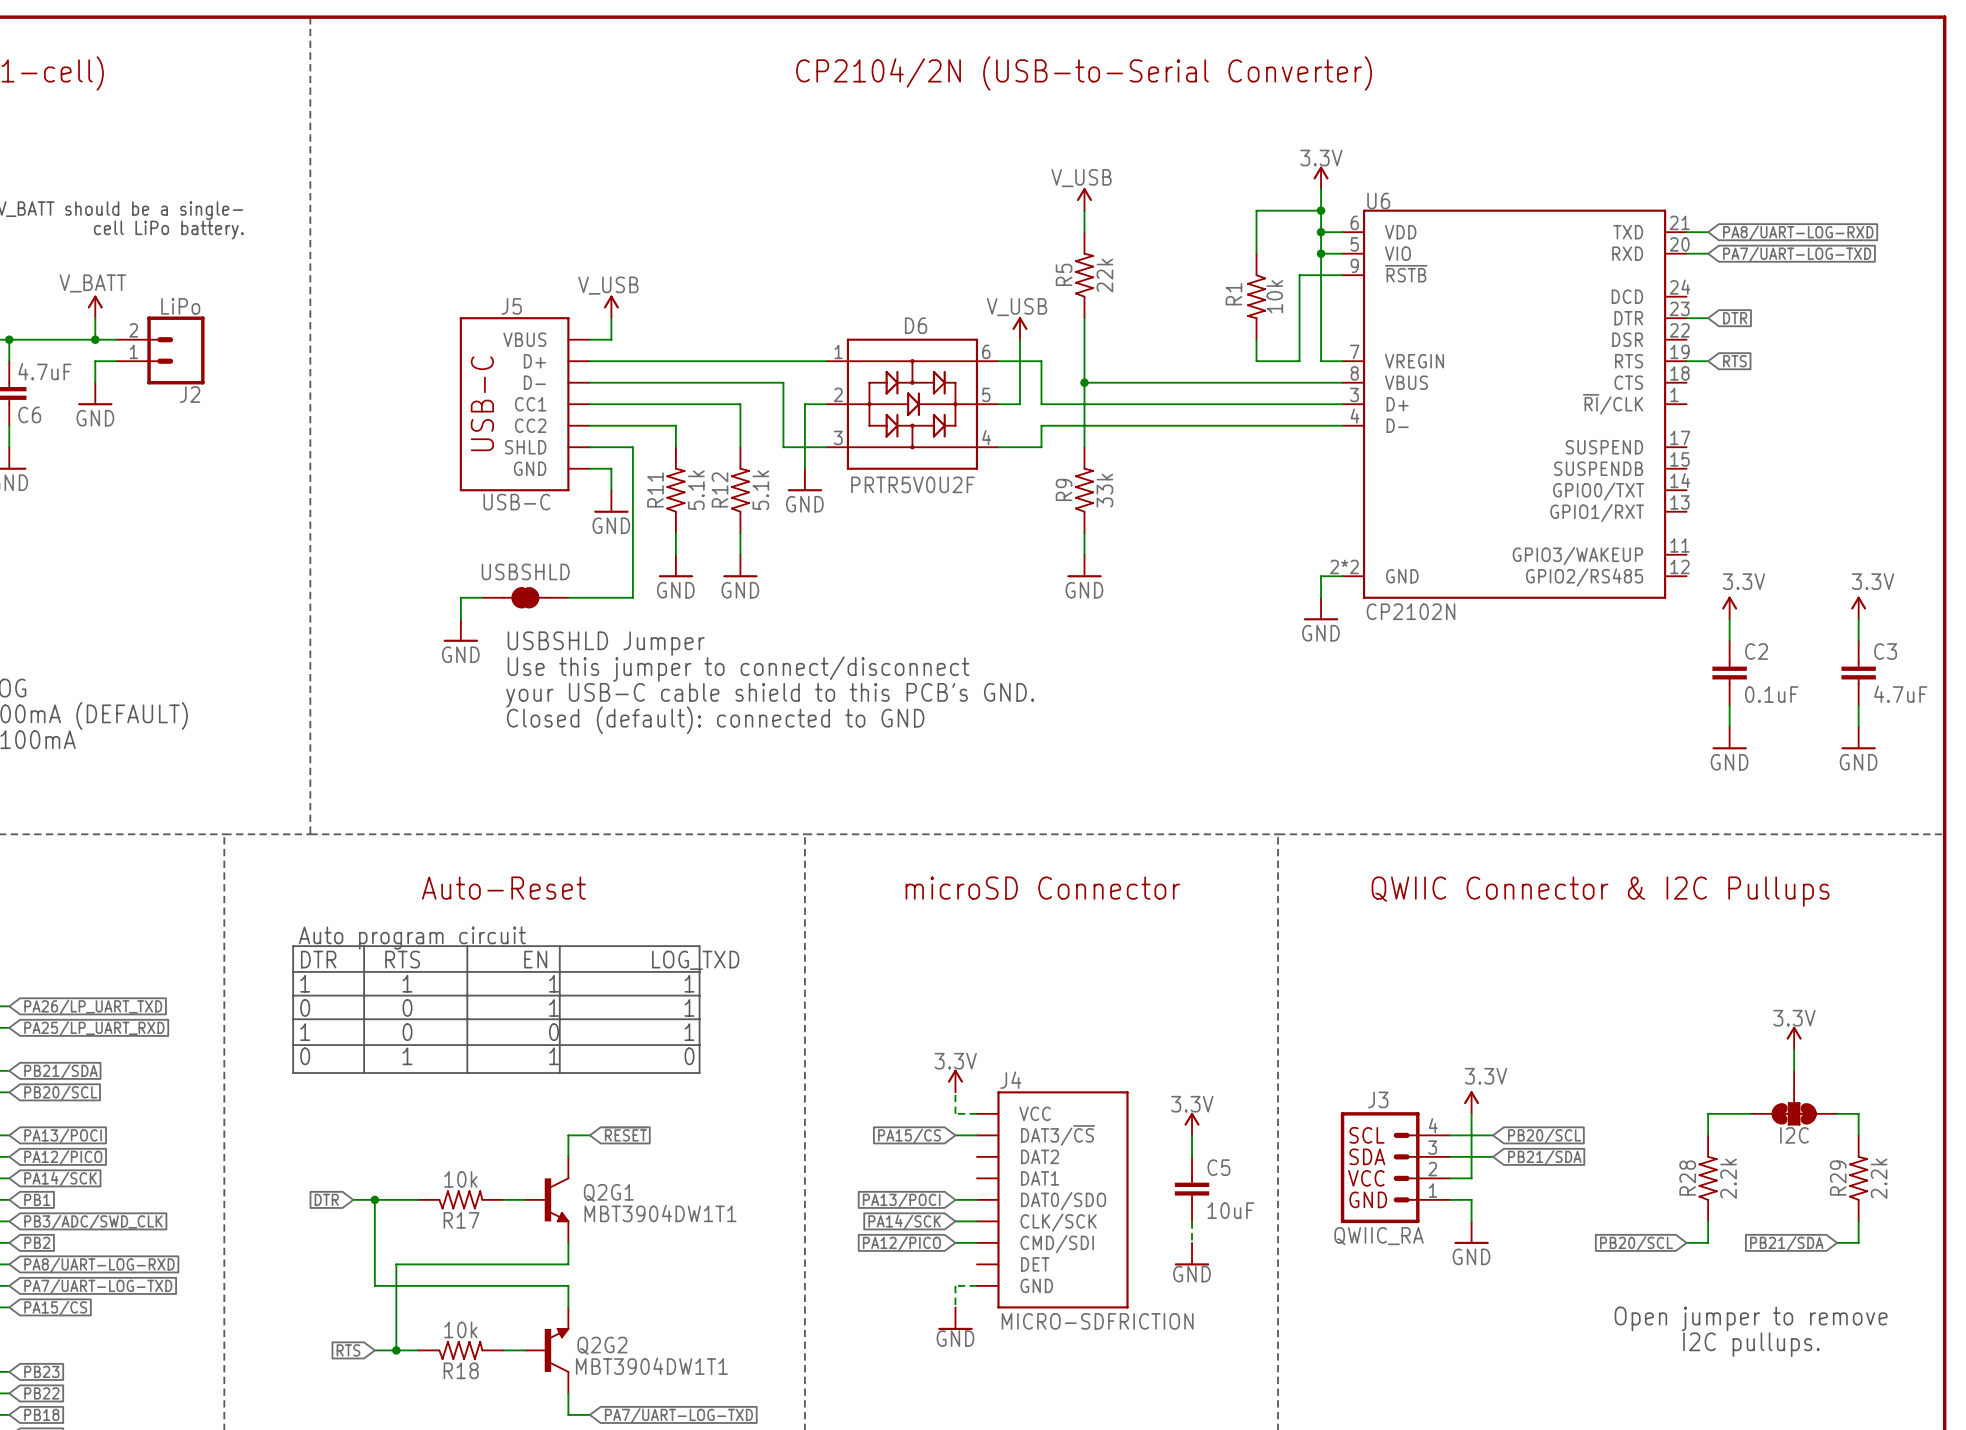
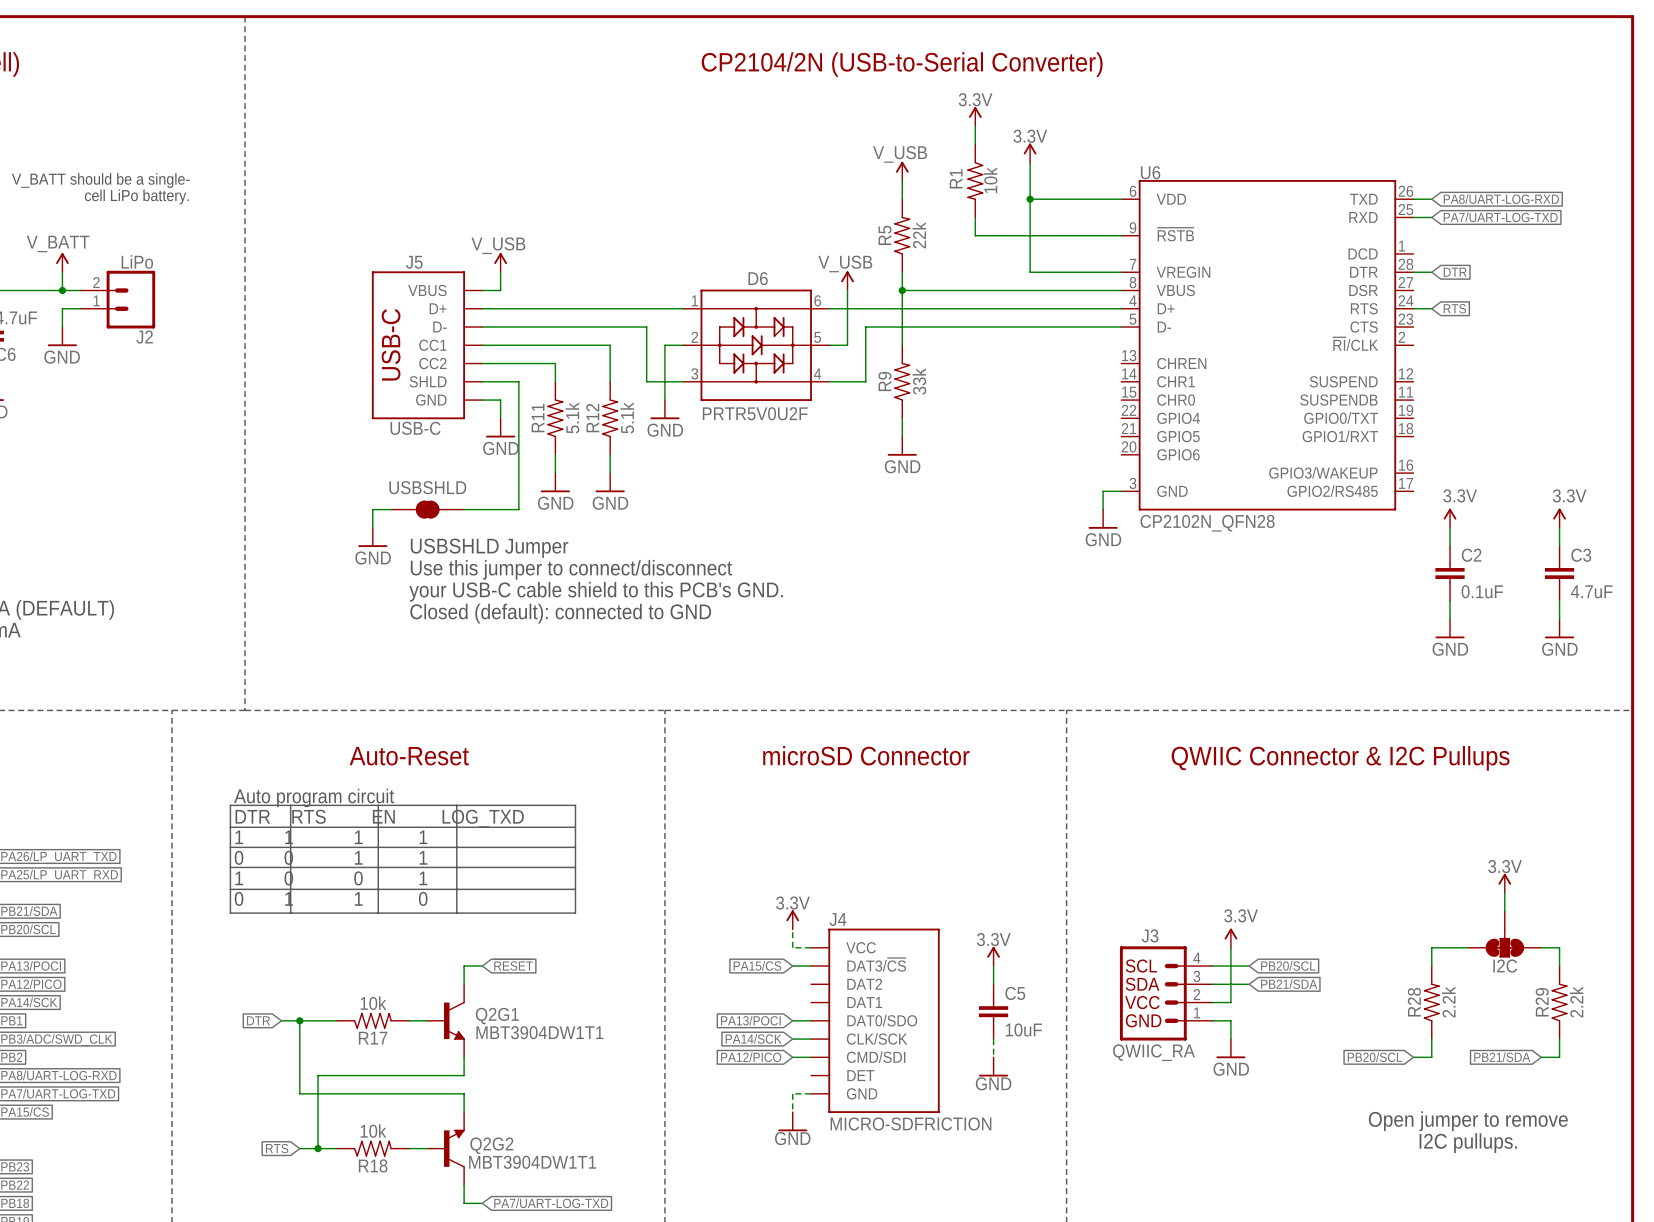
power symbol: none -> 3.3V (975, 116)
wire: none -> (975, 126) (975, 144)
power symbol: none -> 3.3V (1030, 153)
power symbol: 3.3V (1321, 177) -> none
wire: none -> (1030, 162) (1030, 272) (1121, 272)
wire: (1321, 189) (1321, 361) -> none
U6 symbol: [1342, 209, 1687, 599] -> [1121, 180, 1414, 511]
wire: (1321, 210) (1256, 210) (1256, 253) -> none
junction: (1321, 210) -> none
wire: none -> (1030, 199) (1103, 199)
junction: none -> (1030, 199)
junction: (1321, 232) -> none
wire: none -> (975, 217) (975, 235) (1084, 235)
wire: (1321, 253) (1342, 253) -> none
junction: (1321, 253) -> none
wire: (1299, 275) (1299, 361) -> (1103, 308) (1084, 308)
R1 position: (1256, 296) -> (975, 180)
wire: none -> (902, 290) (1121, 290)
wire: (1256, 339) (1256, 361) -> (865, 308) (1048, 308)
wire: (1041, 361) (1041, 382) -> (902, 327) (865, 327)
junction position: (1084, 382) -> (902, 290)
wire: (1041, 404) (1342, 404) -> (865, 345) (865, 363)
wire: (1041, 425) (1342, 425) -> none
R9 position: (1084, 490) -> (902, 381)
wire: (1084, 533) (1084, 554) -> (902, 418) (902, 436)
power symbol position: GND (1084, 566) -> GND (902, 446)
U6 value: CP2102N (1410, 611) -> CP2102N_QFN28 (1207, 523)

